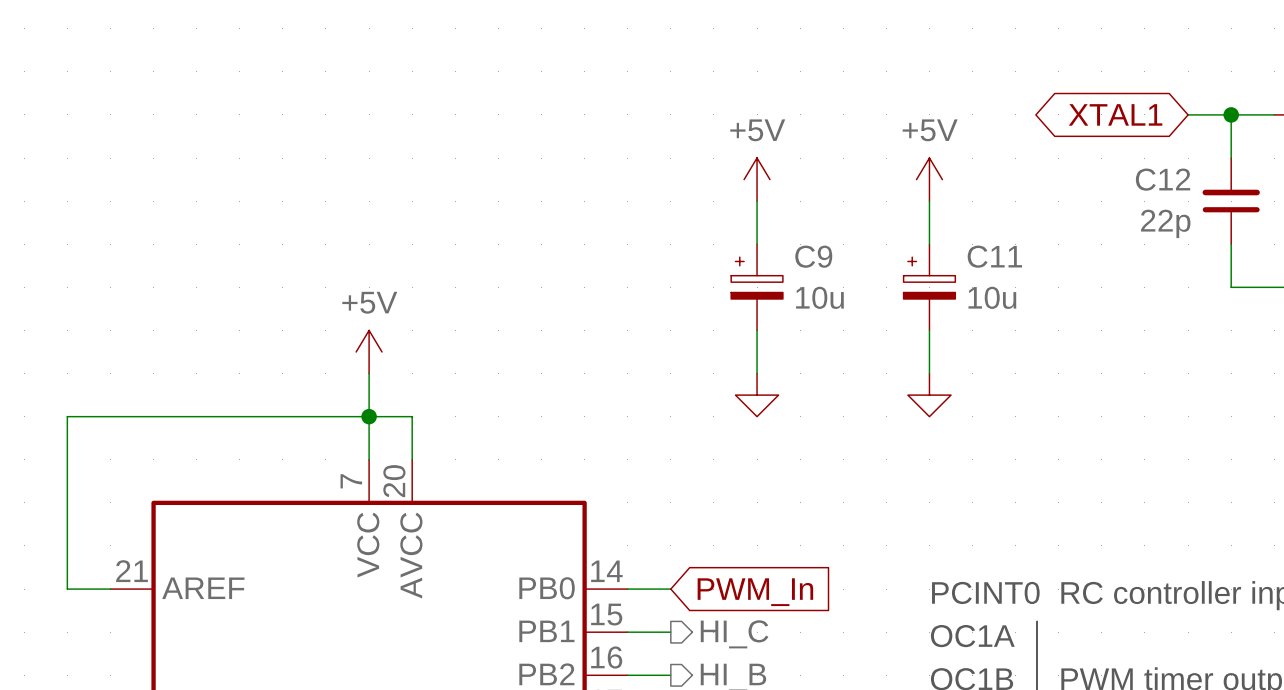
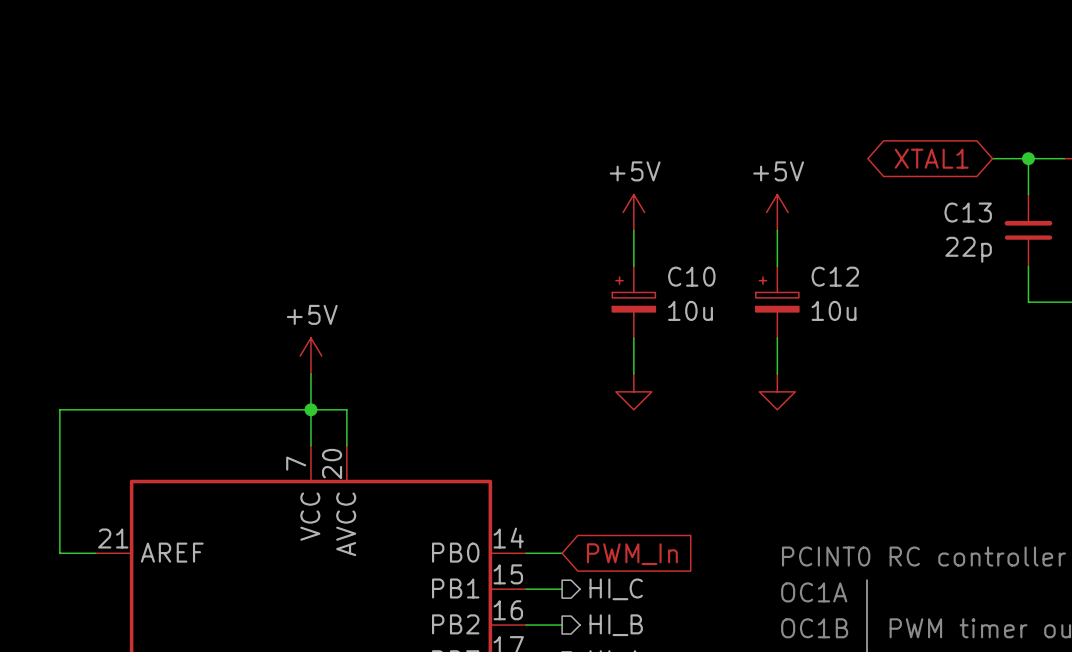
C12 name: C12 (1163, 179) -> C13 (968, 212)
C9 name: C9 (813, 256) -> C10 (691, 276)
C11 name: C11 (994, 256) -> C12 (835, 276)

